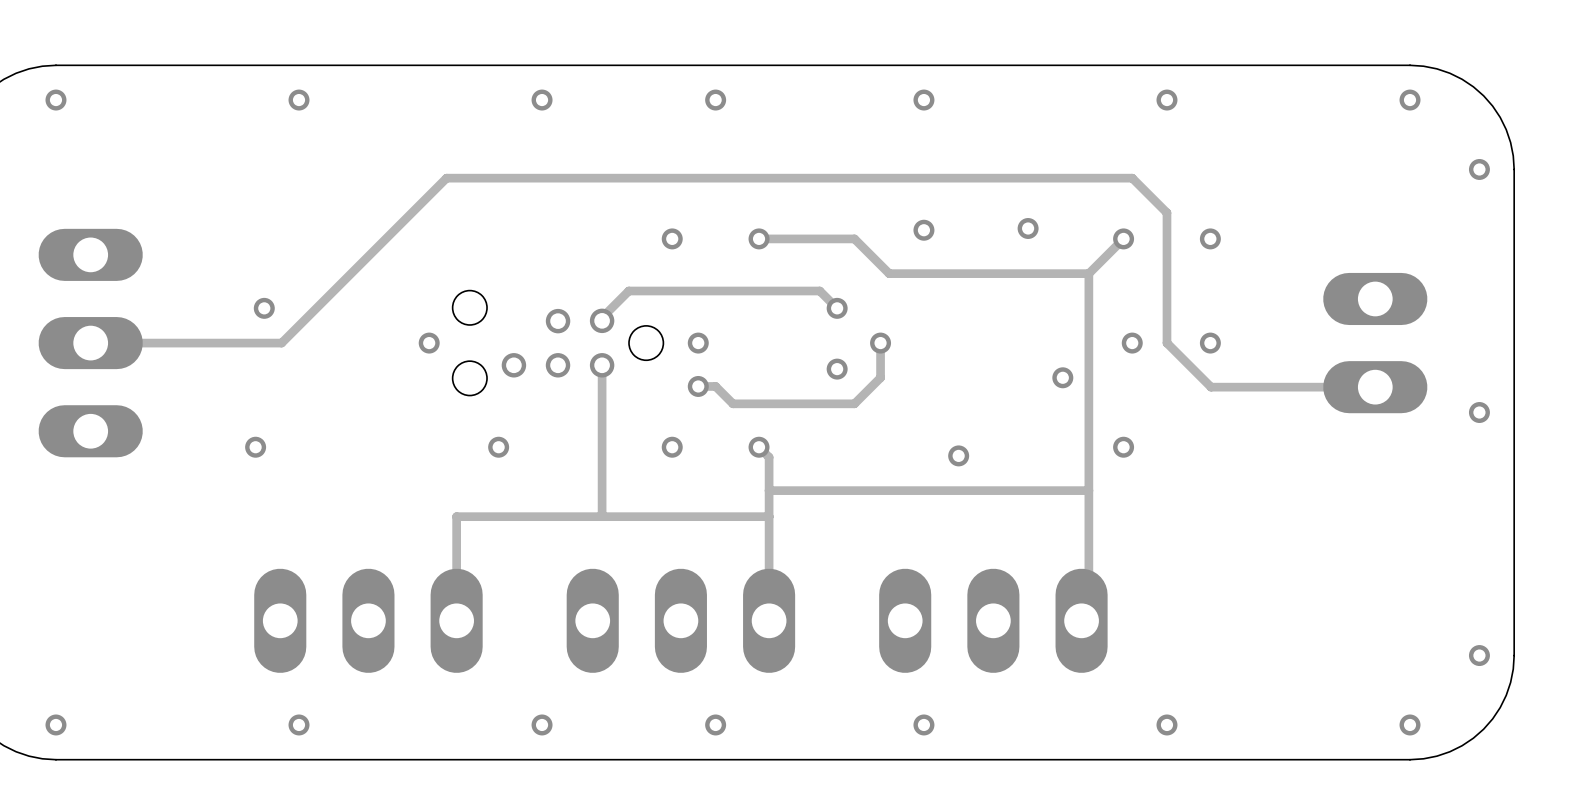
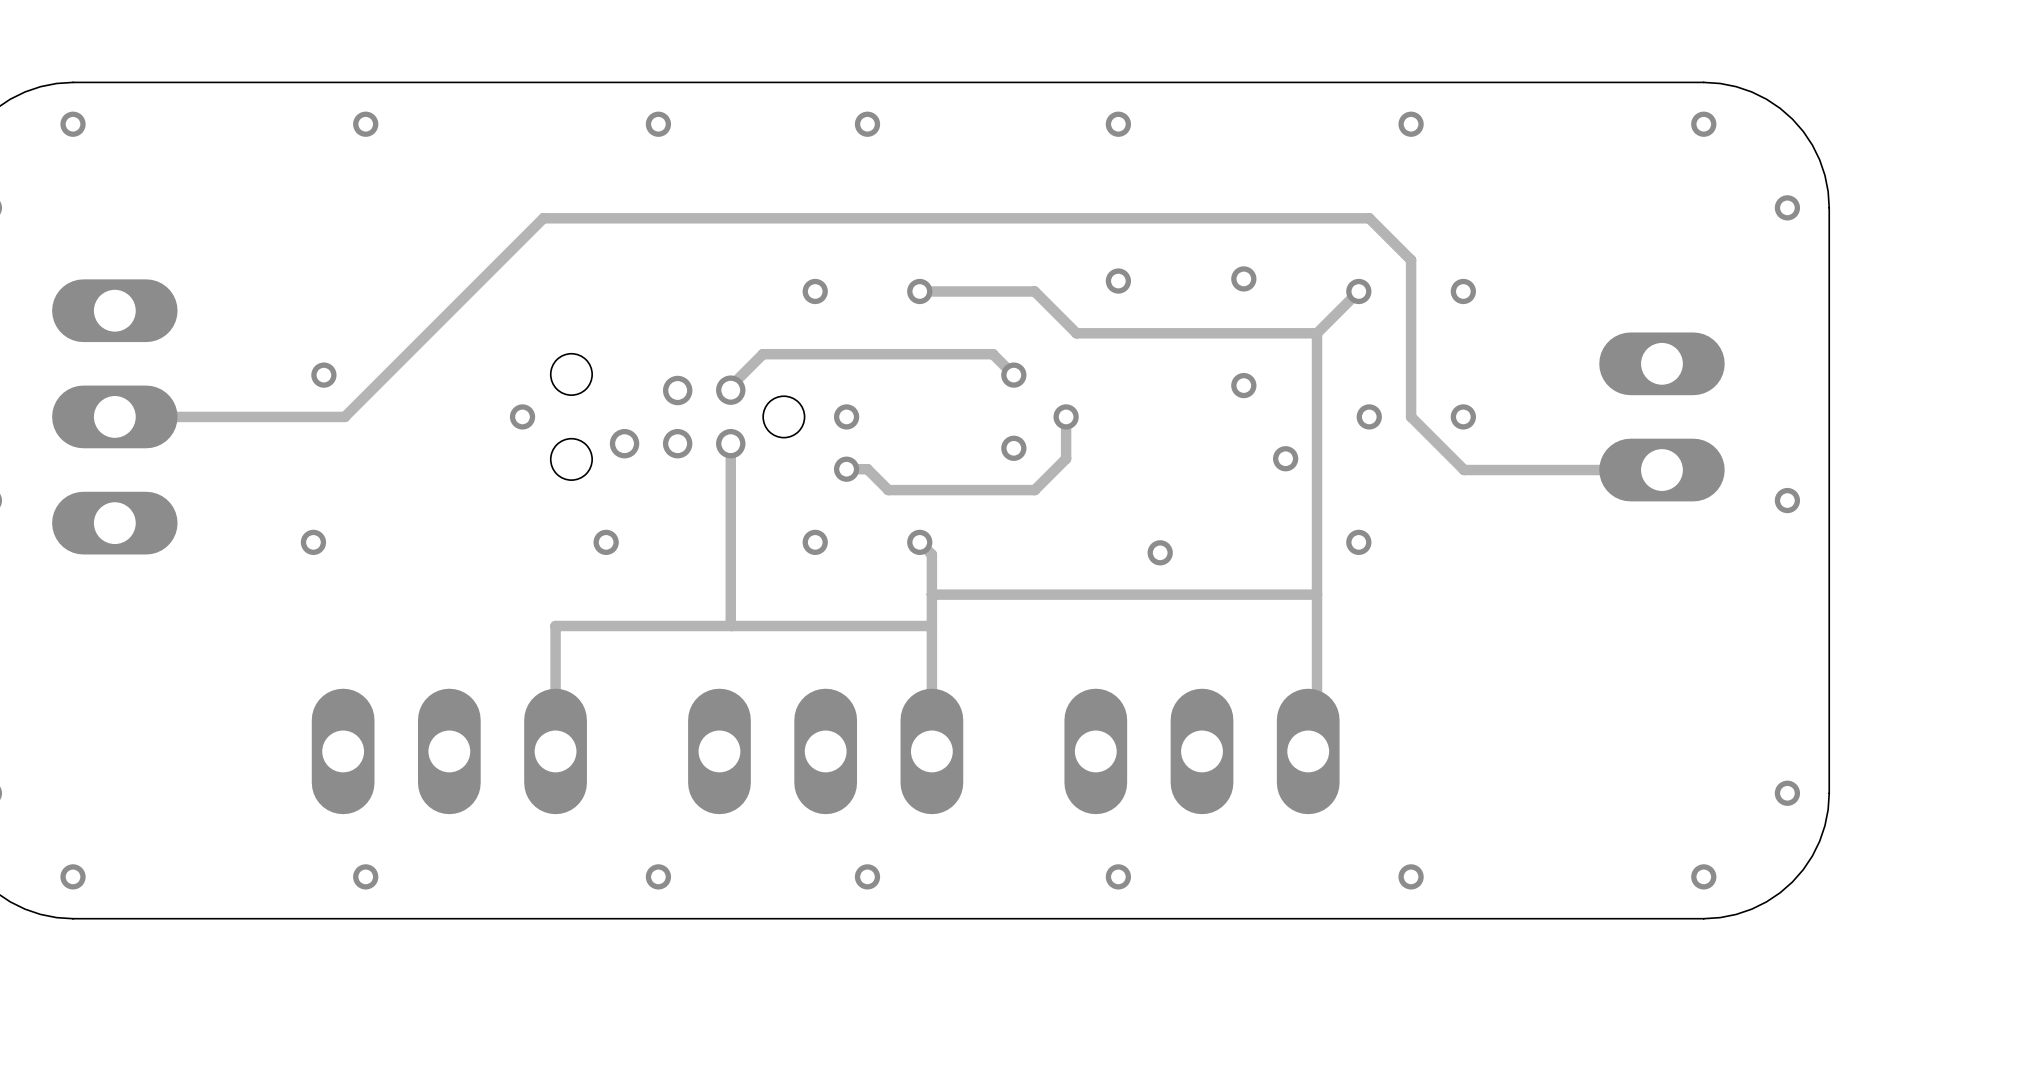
via: none -> (1243, 385)

